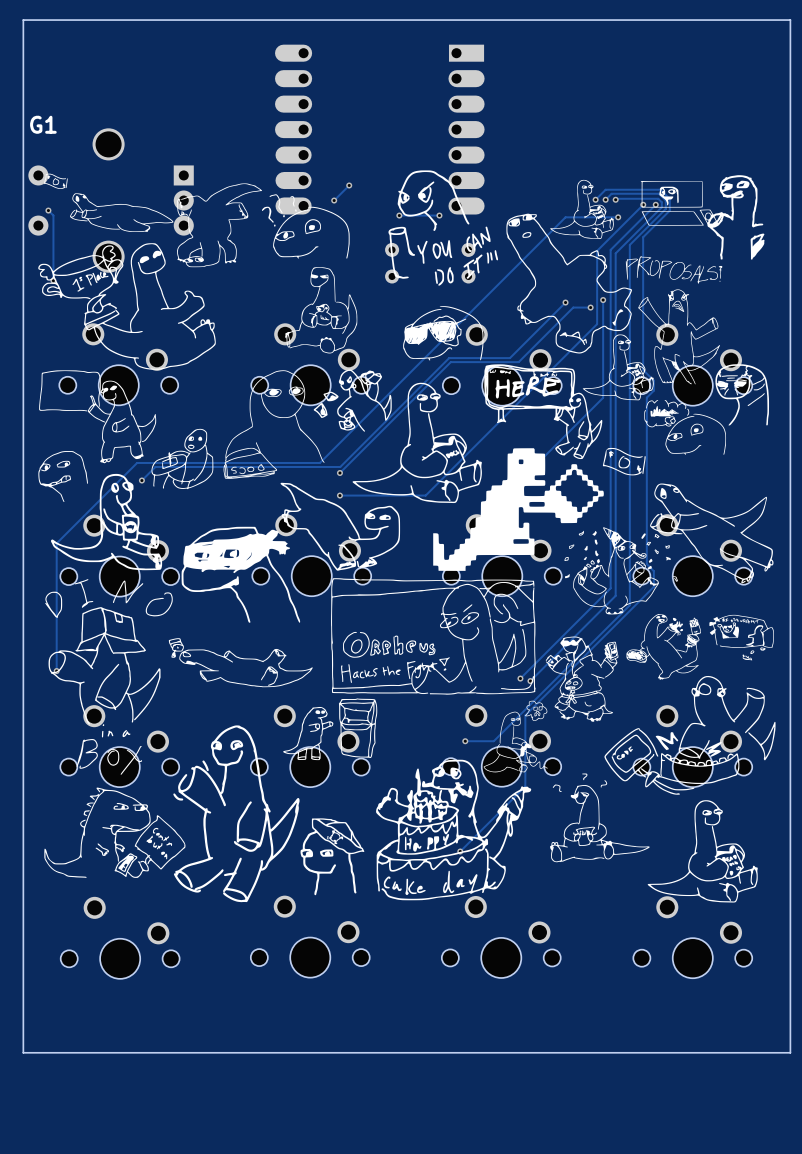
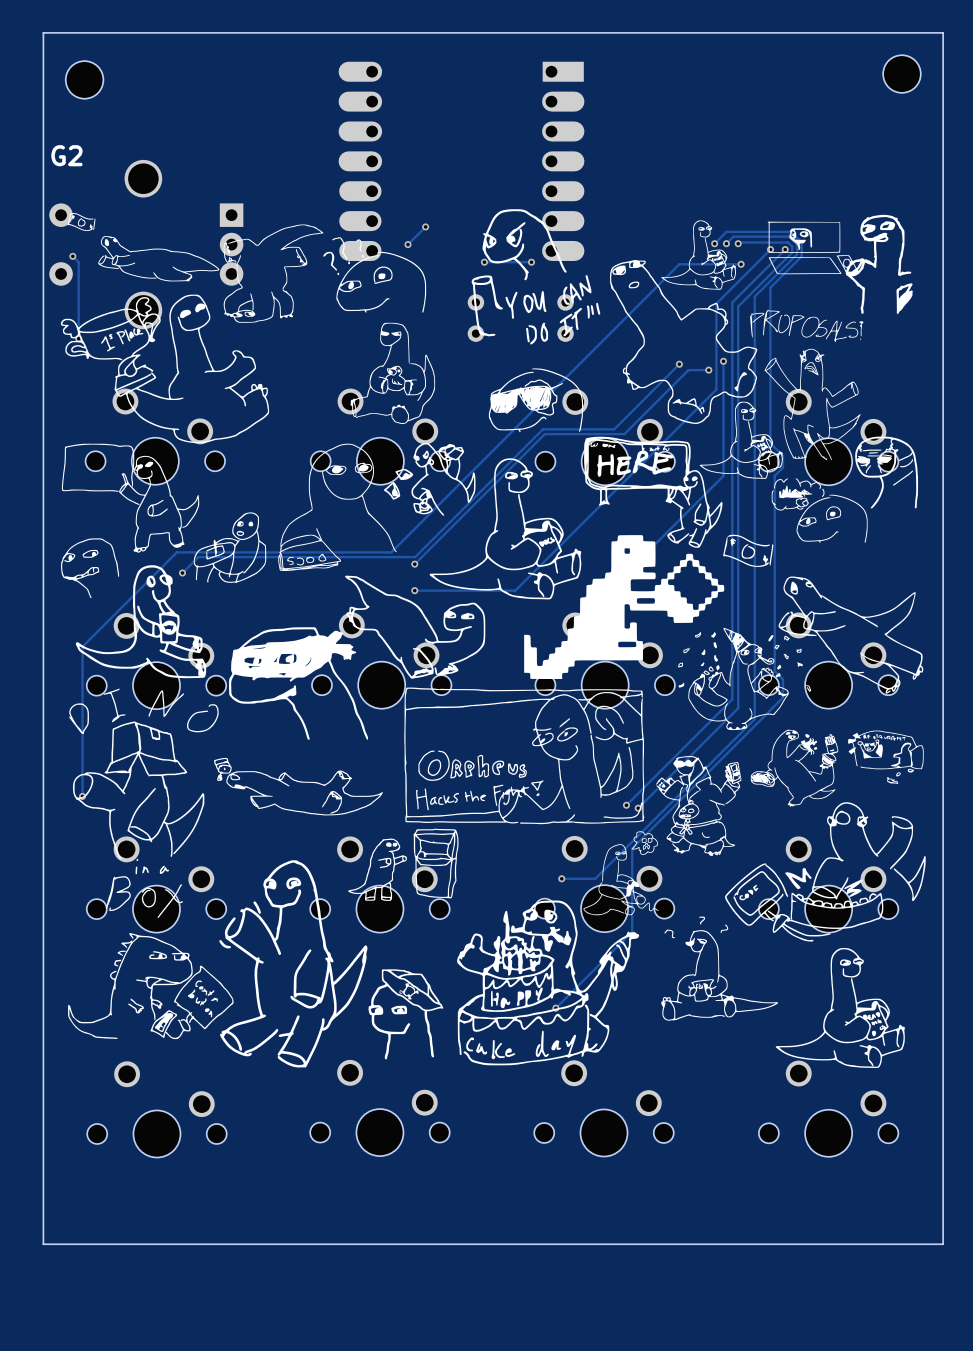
part: none -> (901, 74)
part: none -> (84, 79)
G1 name: G1 (43, 124) -> G2 (66, 155)

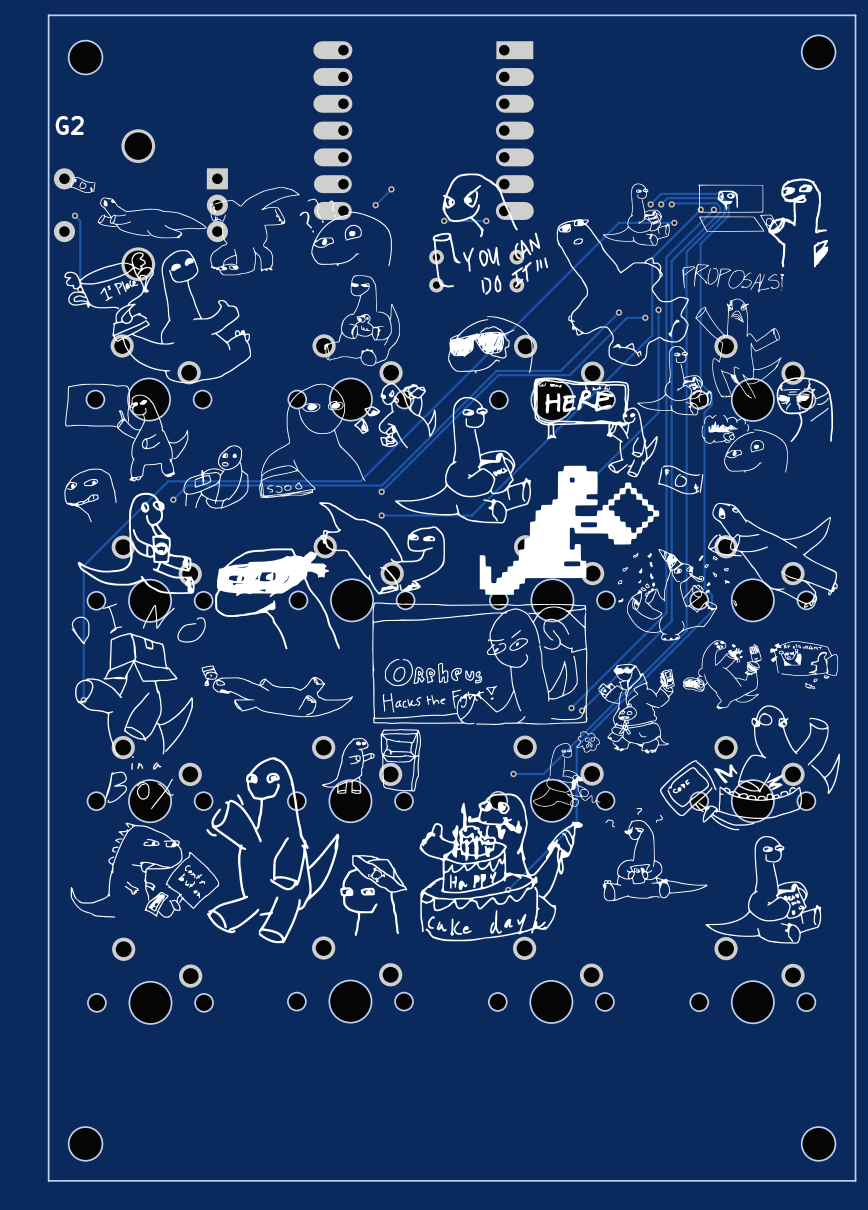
board edge: (943, 1244) (43, 1244) -> (855, 1101) (855, 1180) (48, 1180) (48, 1101)
part: none -> (85, 1143)
part: none -> (818, 1143)

